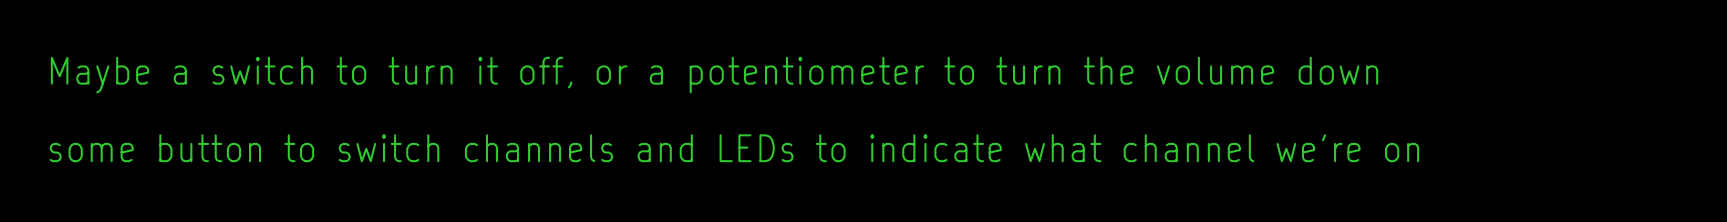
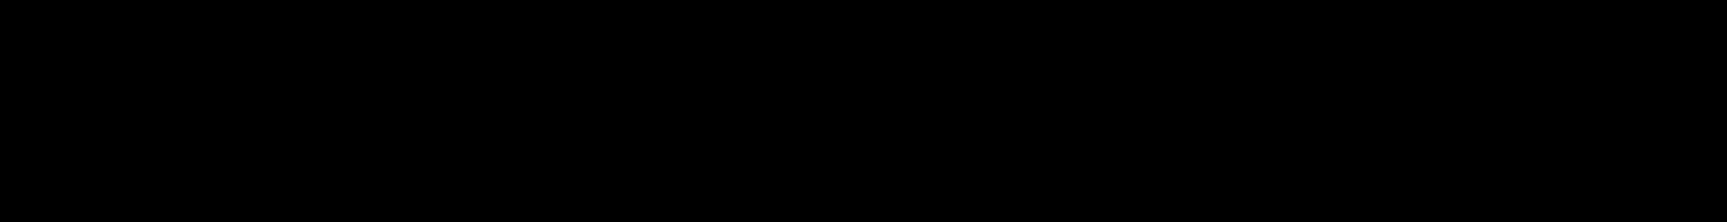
text: Maybe a switch to turn it off, or a potentiometer to turn the volume down (714, 75) -> none
text: some button to switch channels and LEDs to indicate what channel we're on (734, 148) -> none

